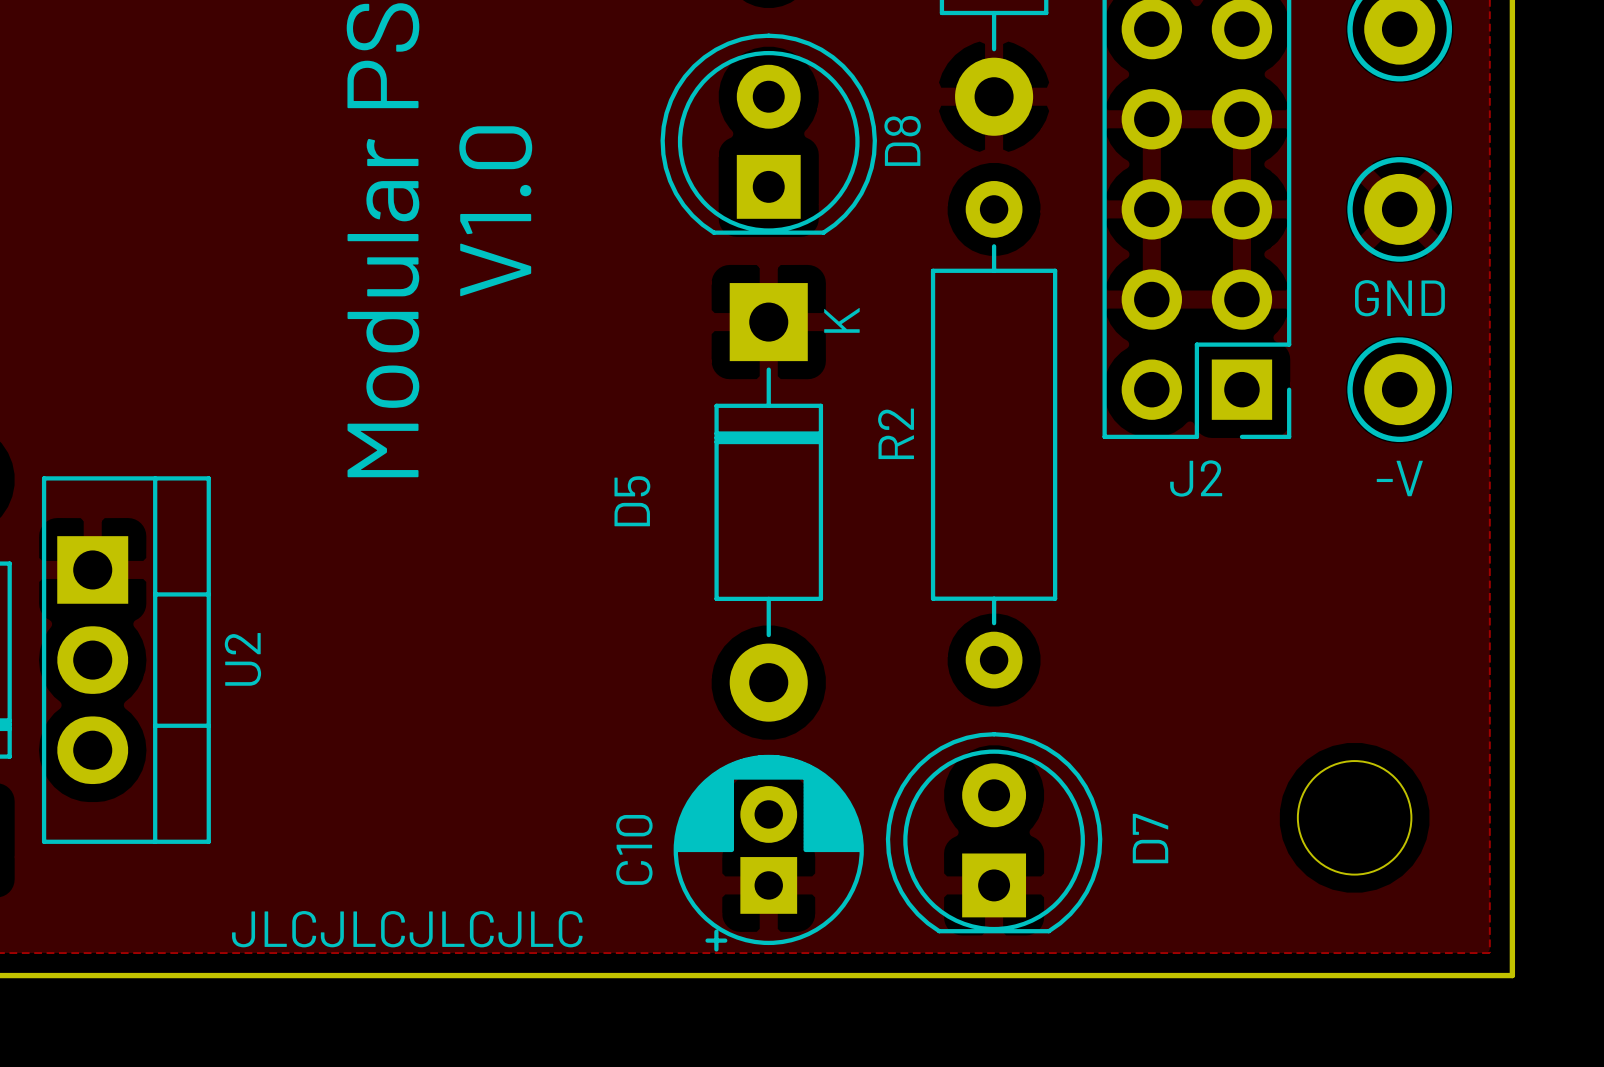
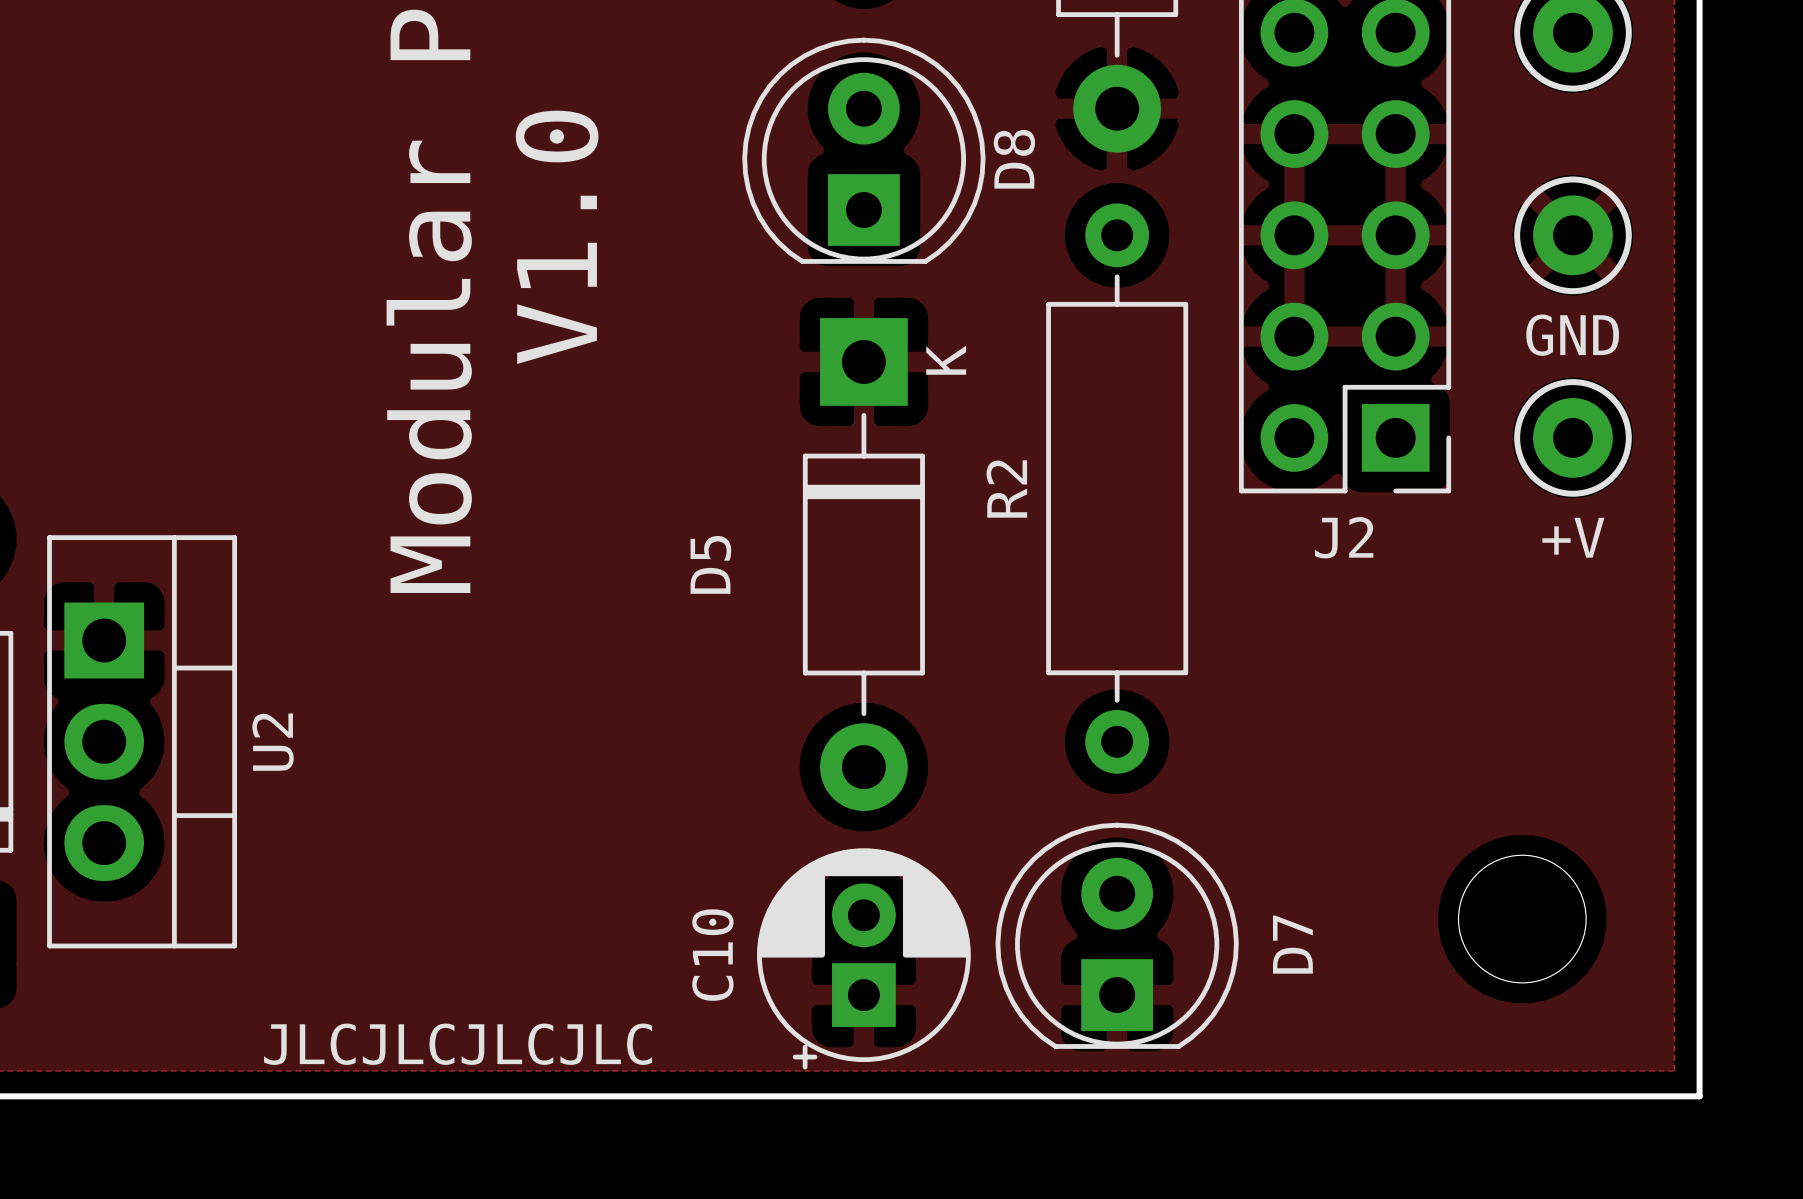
part text: -V (1399, 478) -> +V (1573, 537)

